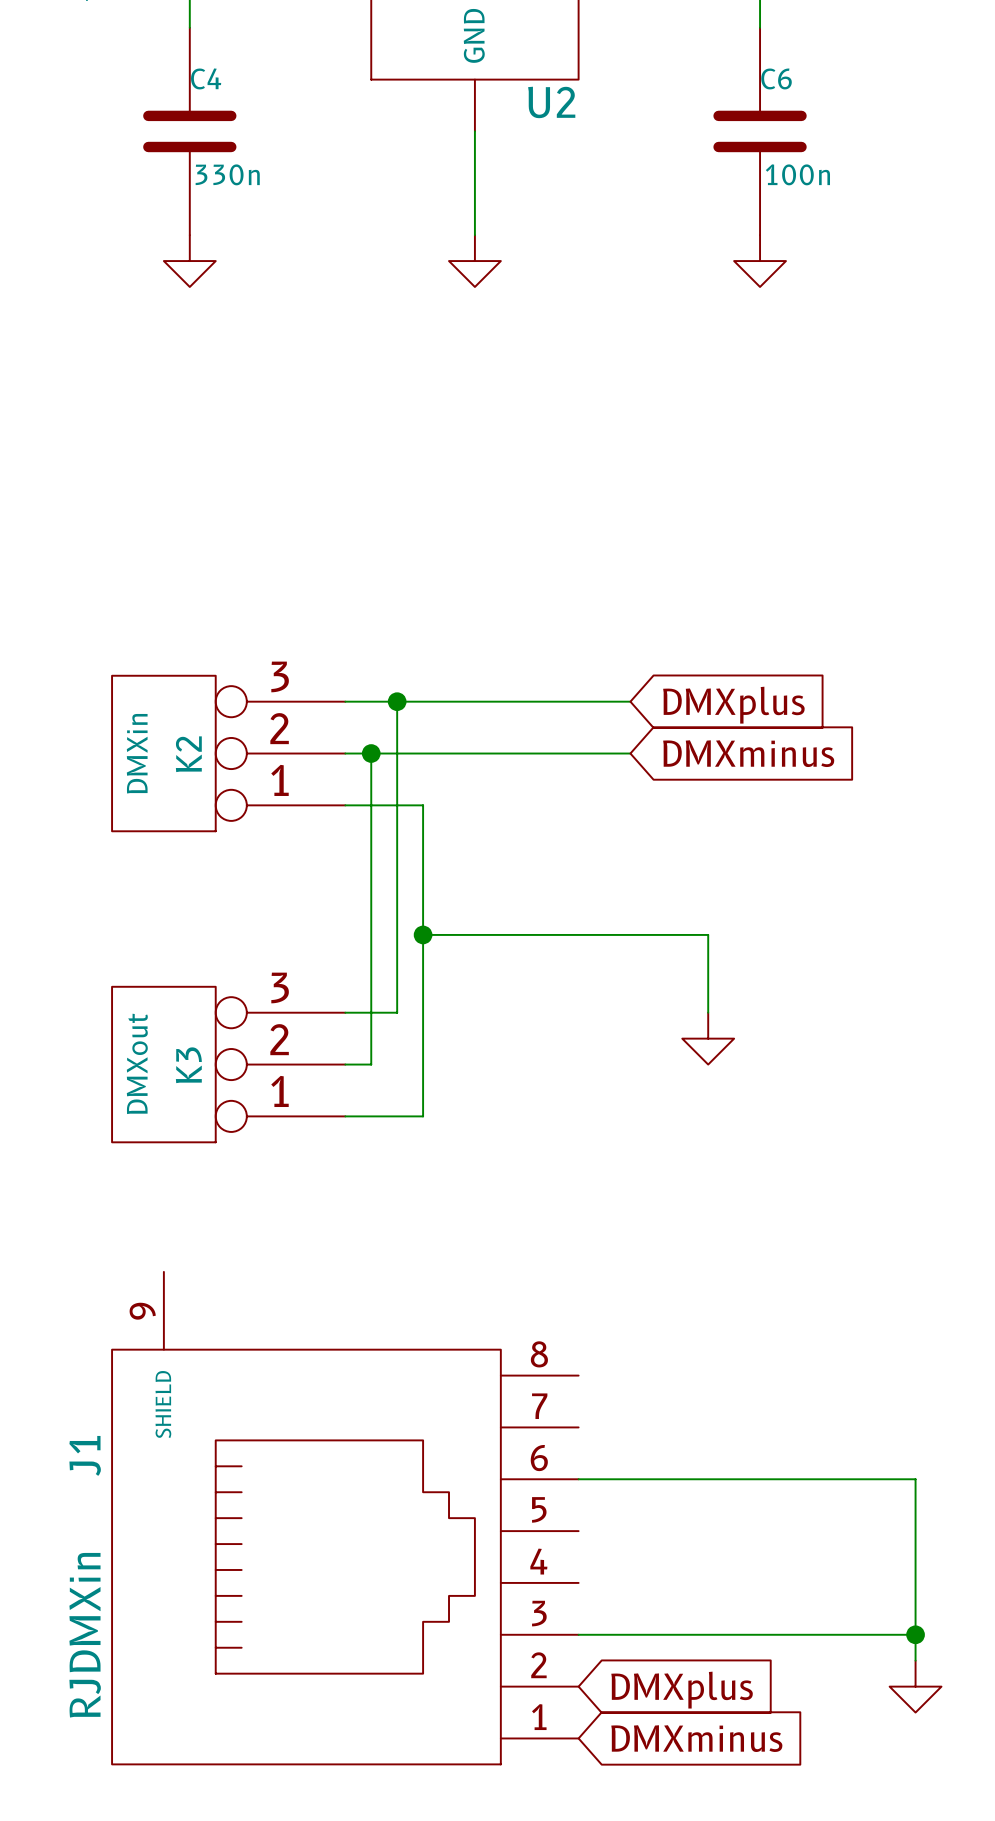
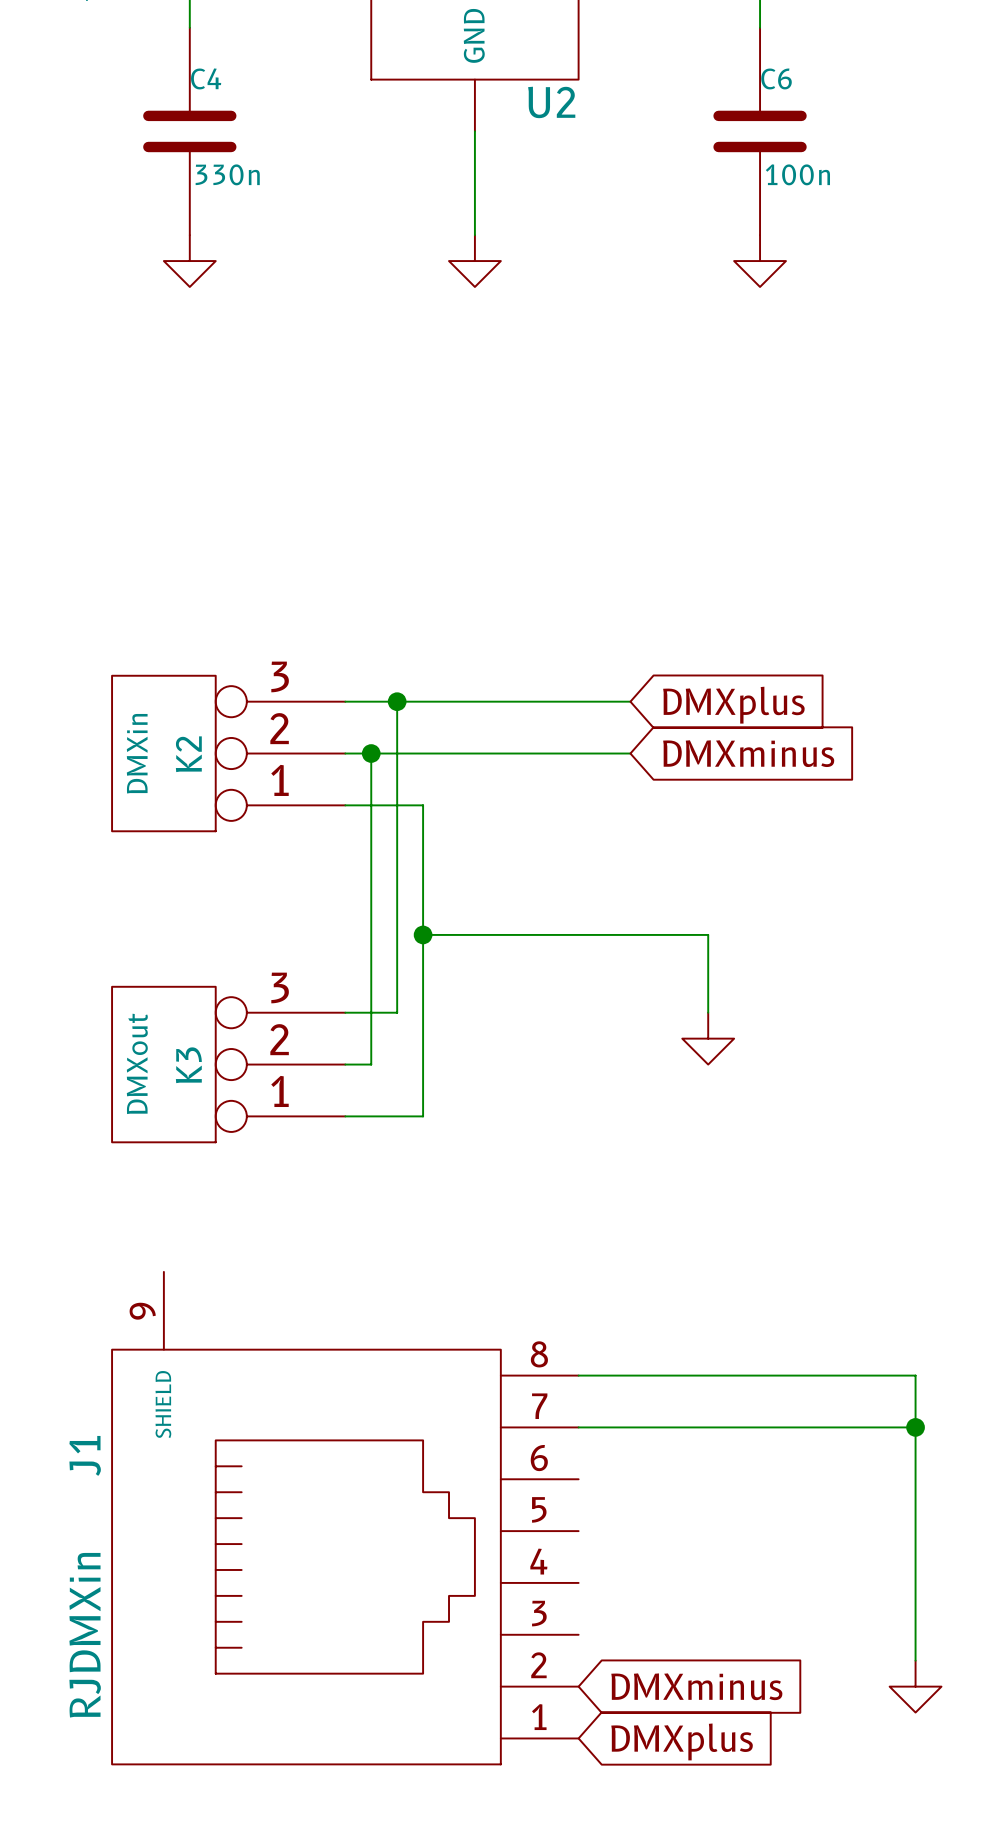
junction: none -> (915, 1427)
wire: (578, 1479) (915, 1479) -> (578, 1375) (915, 1375) (915, 1479)
wire: (578, 1634) (915, 1634) -> (578, 1427) (915, 1427)
junction: (915, 1634) -> none
global label: DMXplus (682, 1690) -> DMXminus (696, 1686)
global label: DMXminus (696, 1738) -> DMXplus (682, 1741)

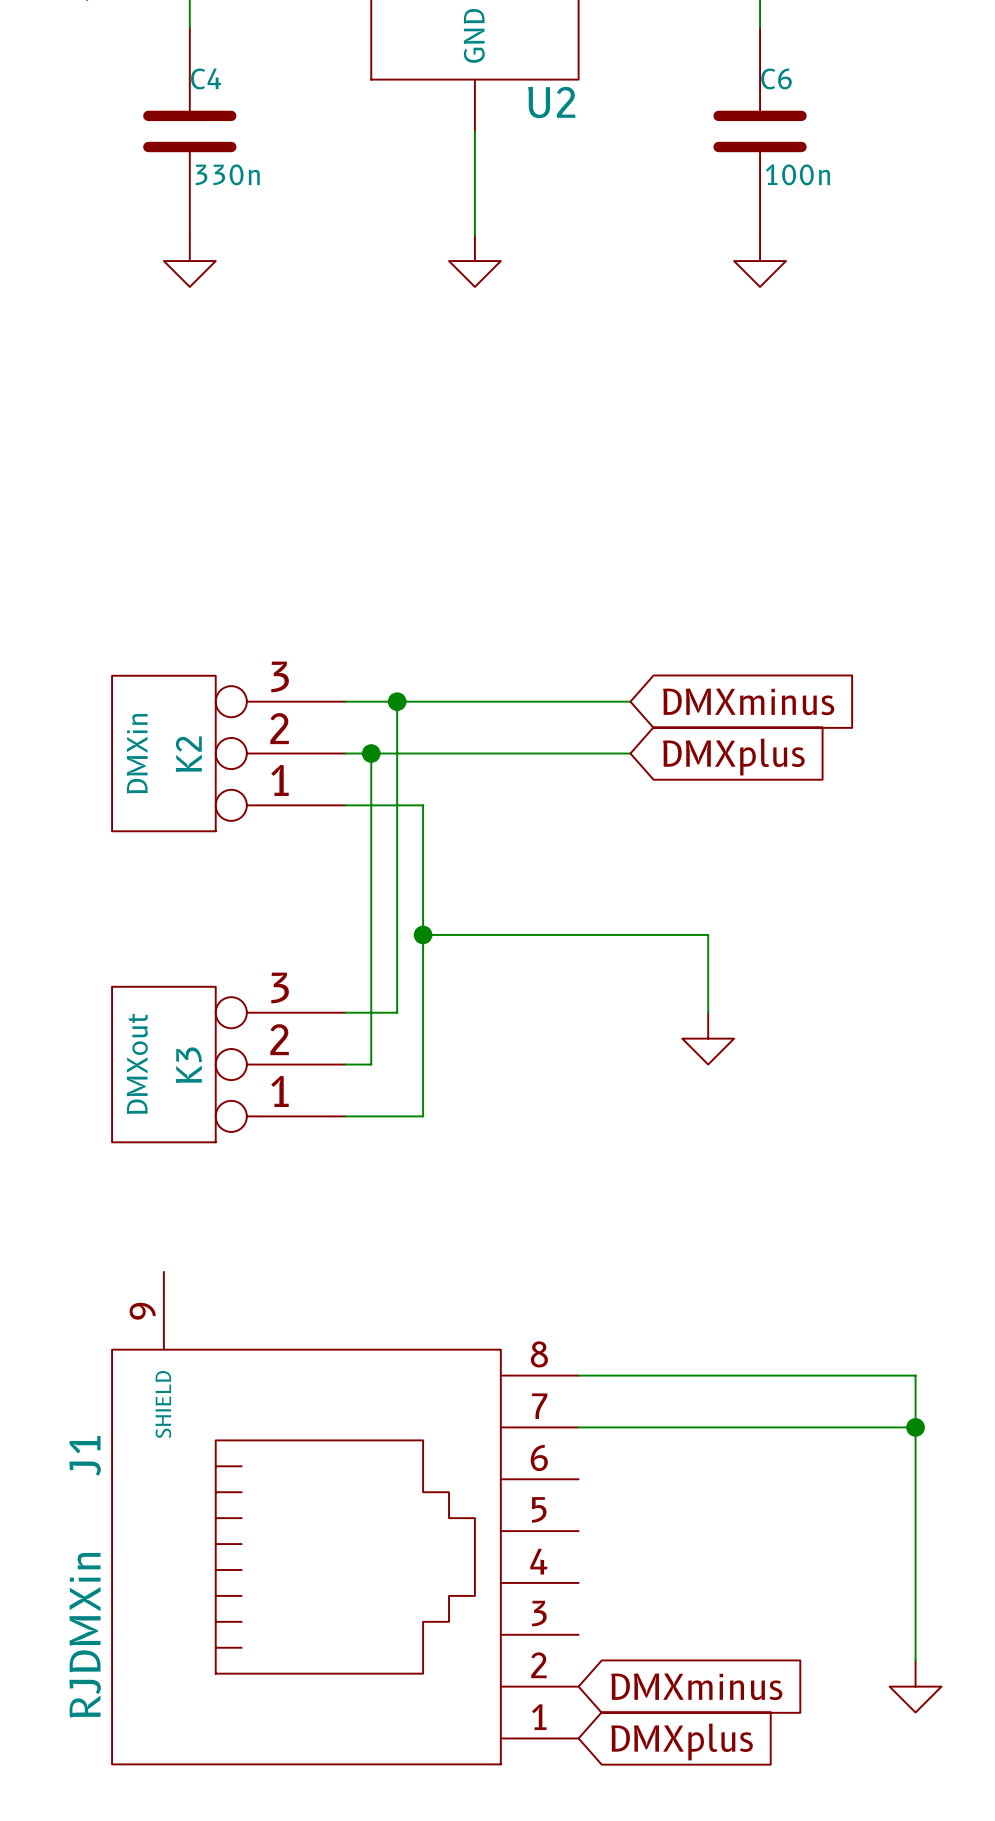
global label: DMXplus (733, 705) -> DMXminus (748, 701)
global label: DMXminus (748, 753) -> DMXplus (733, 756)

